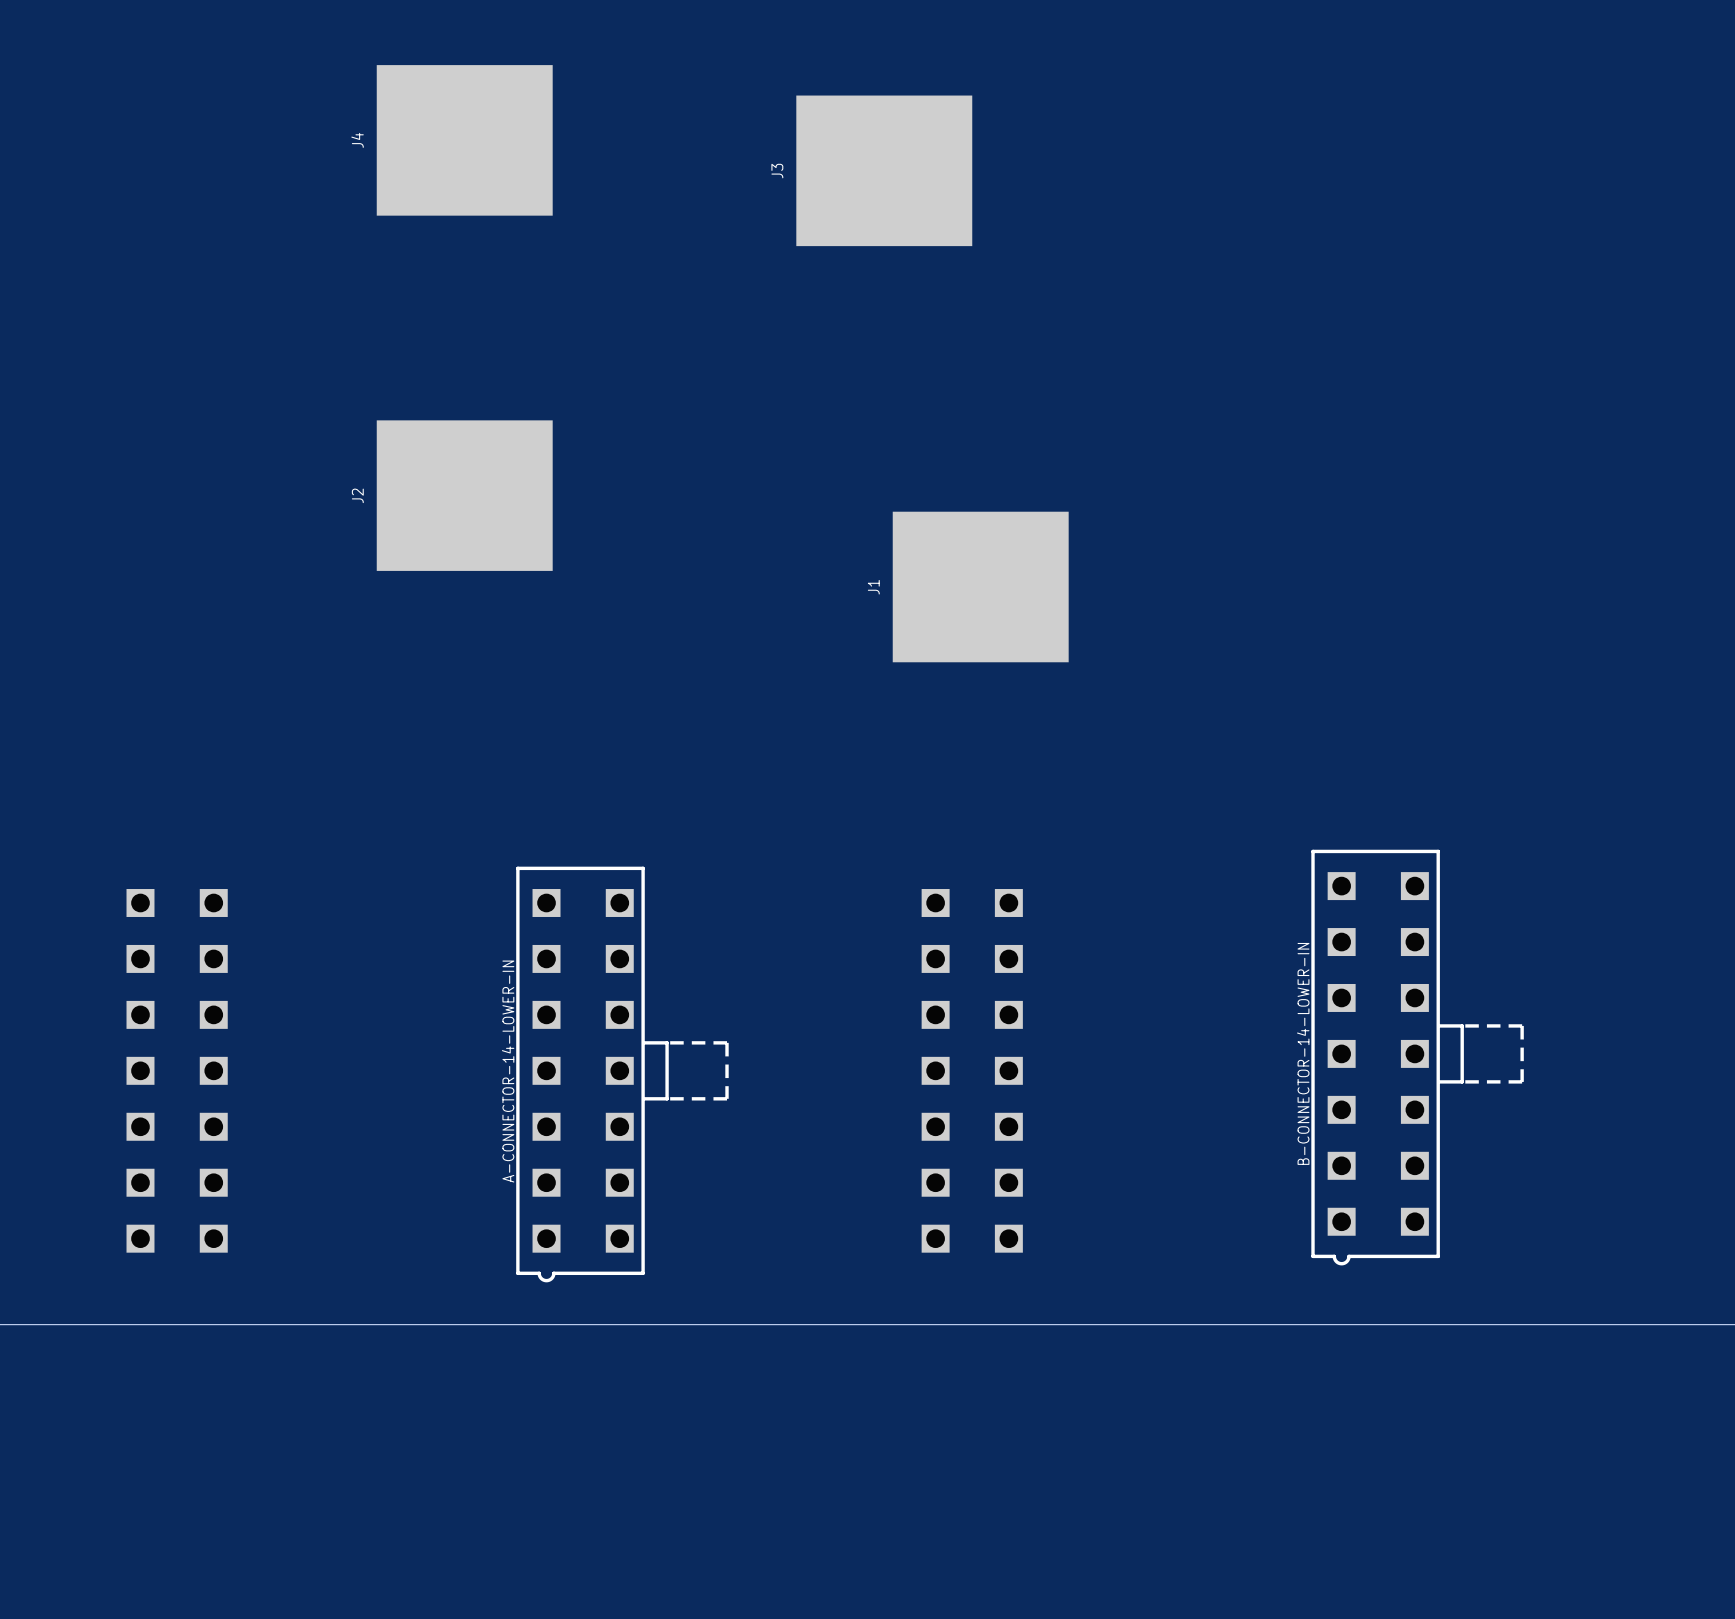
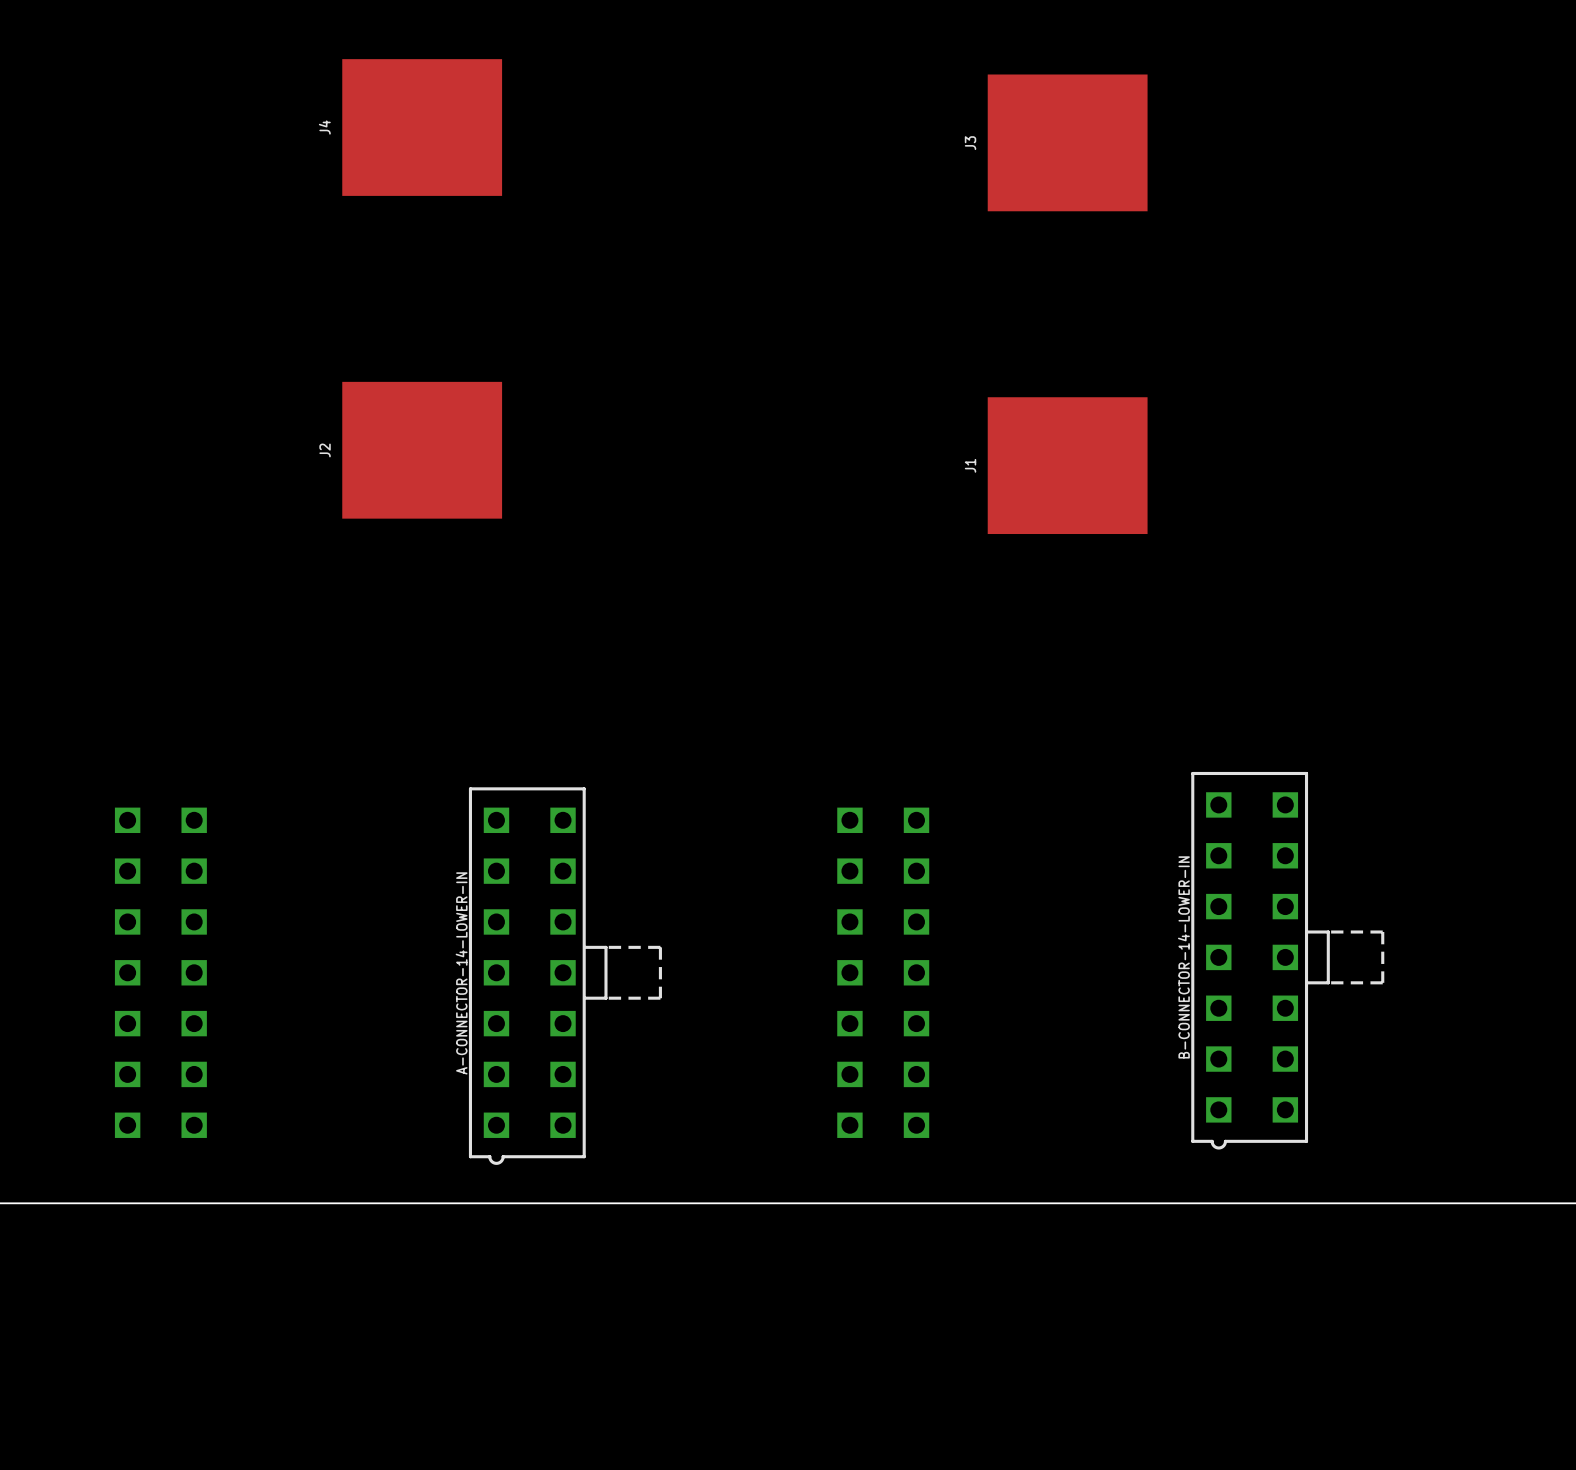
J3 position: (884, 170) -> (1067, 142)
J1 position: (980, 586) -> (1067, 465)

